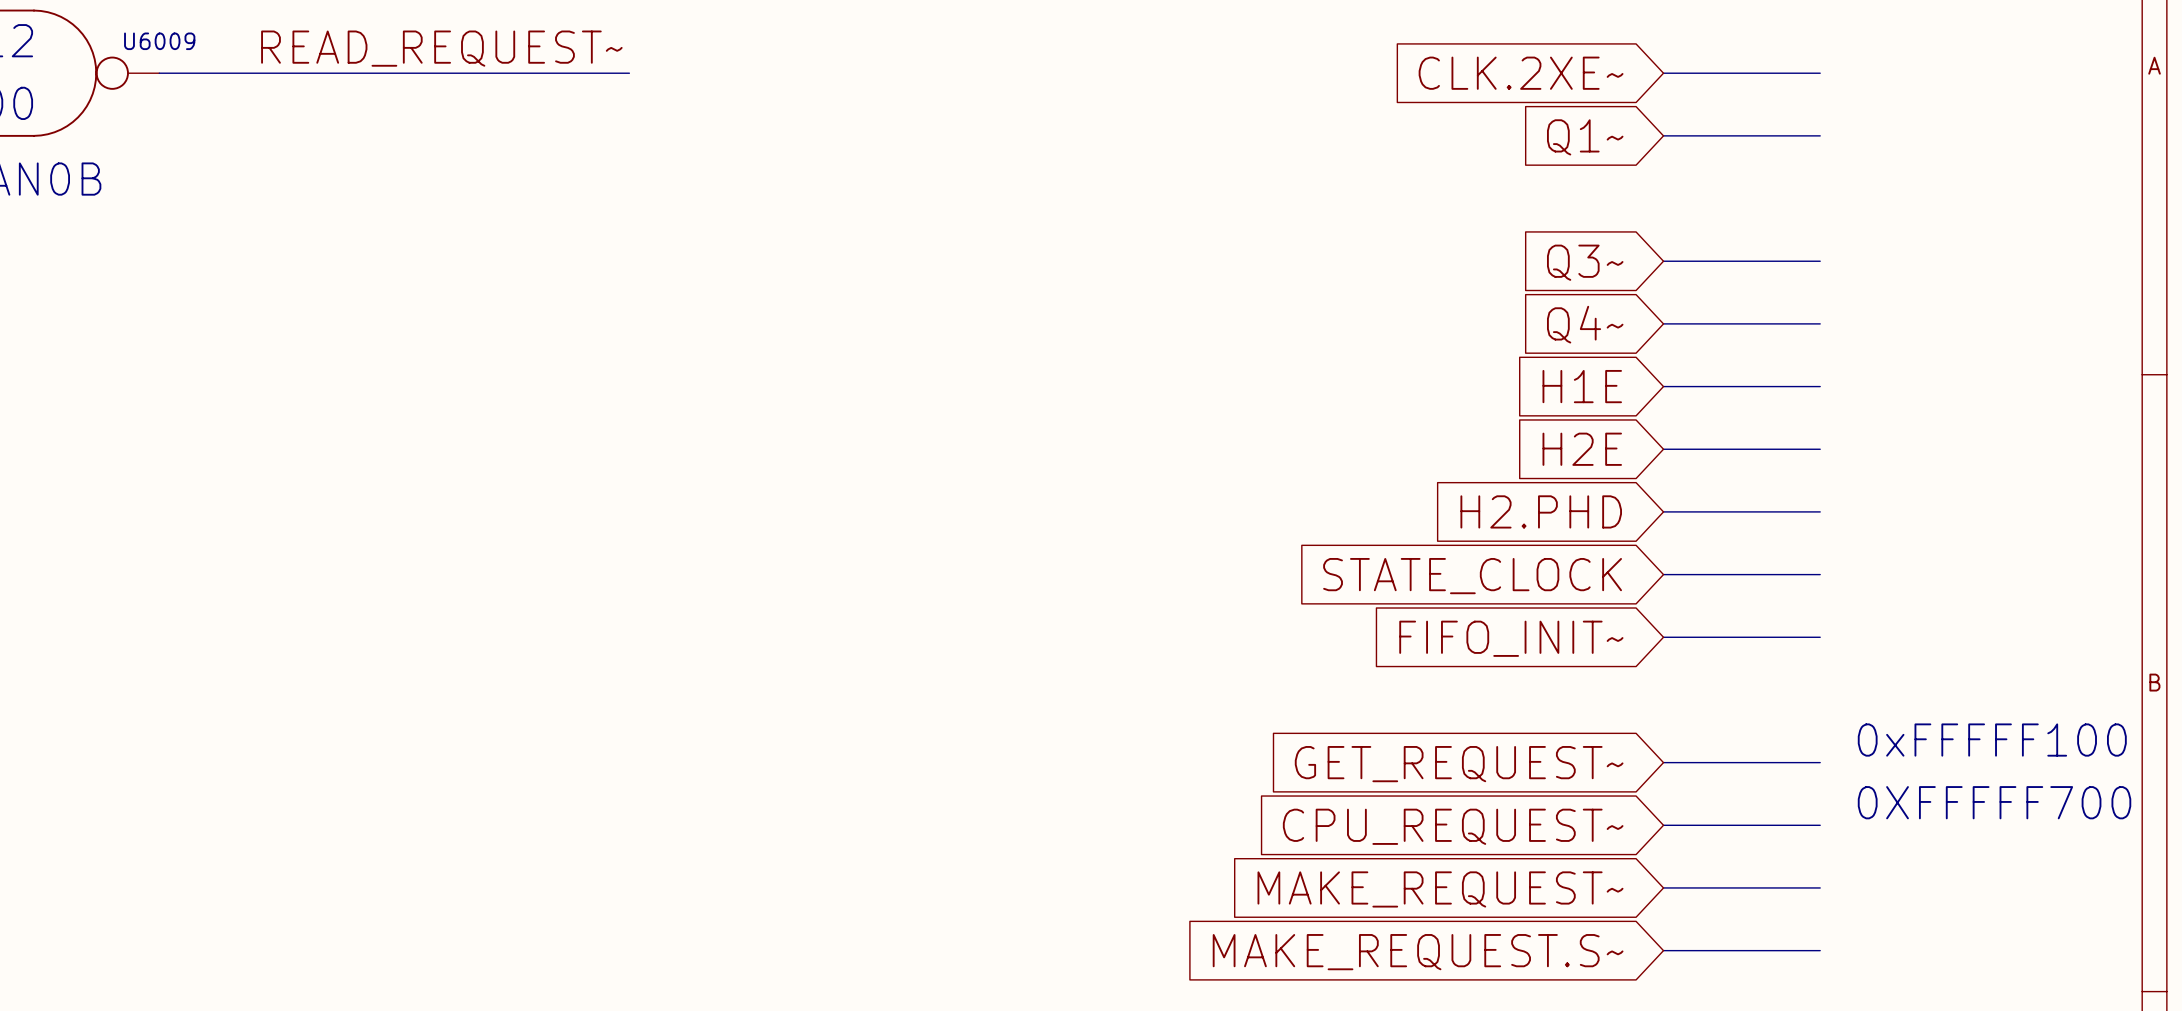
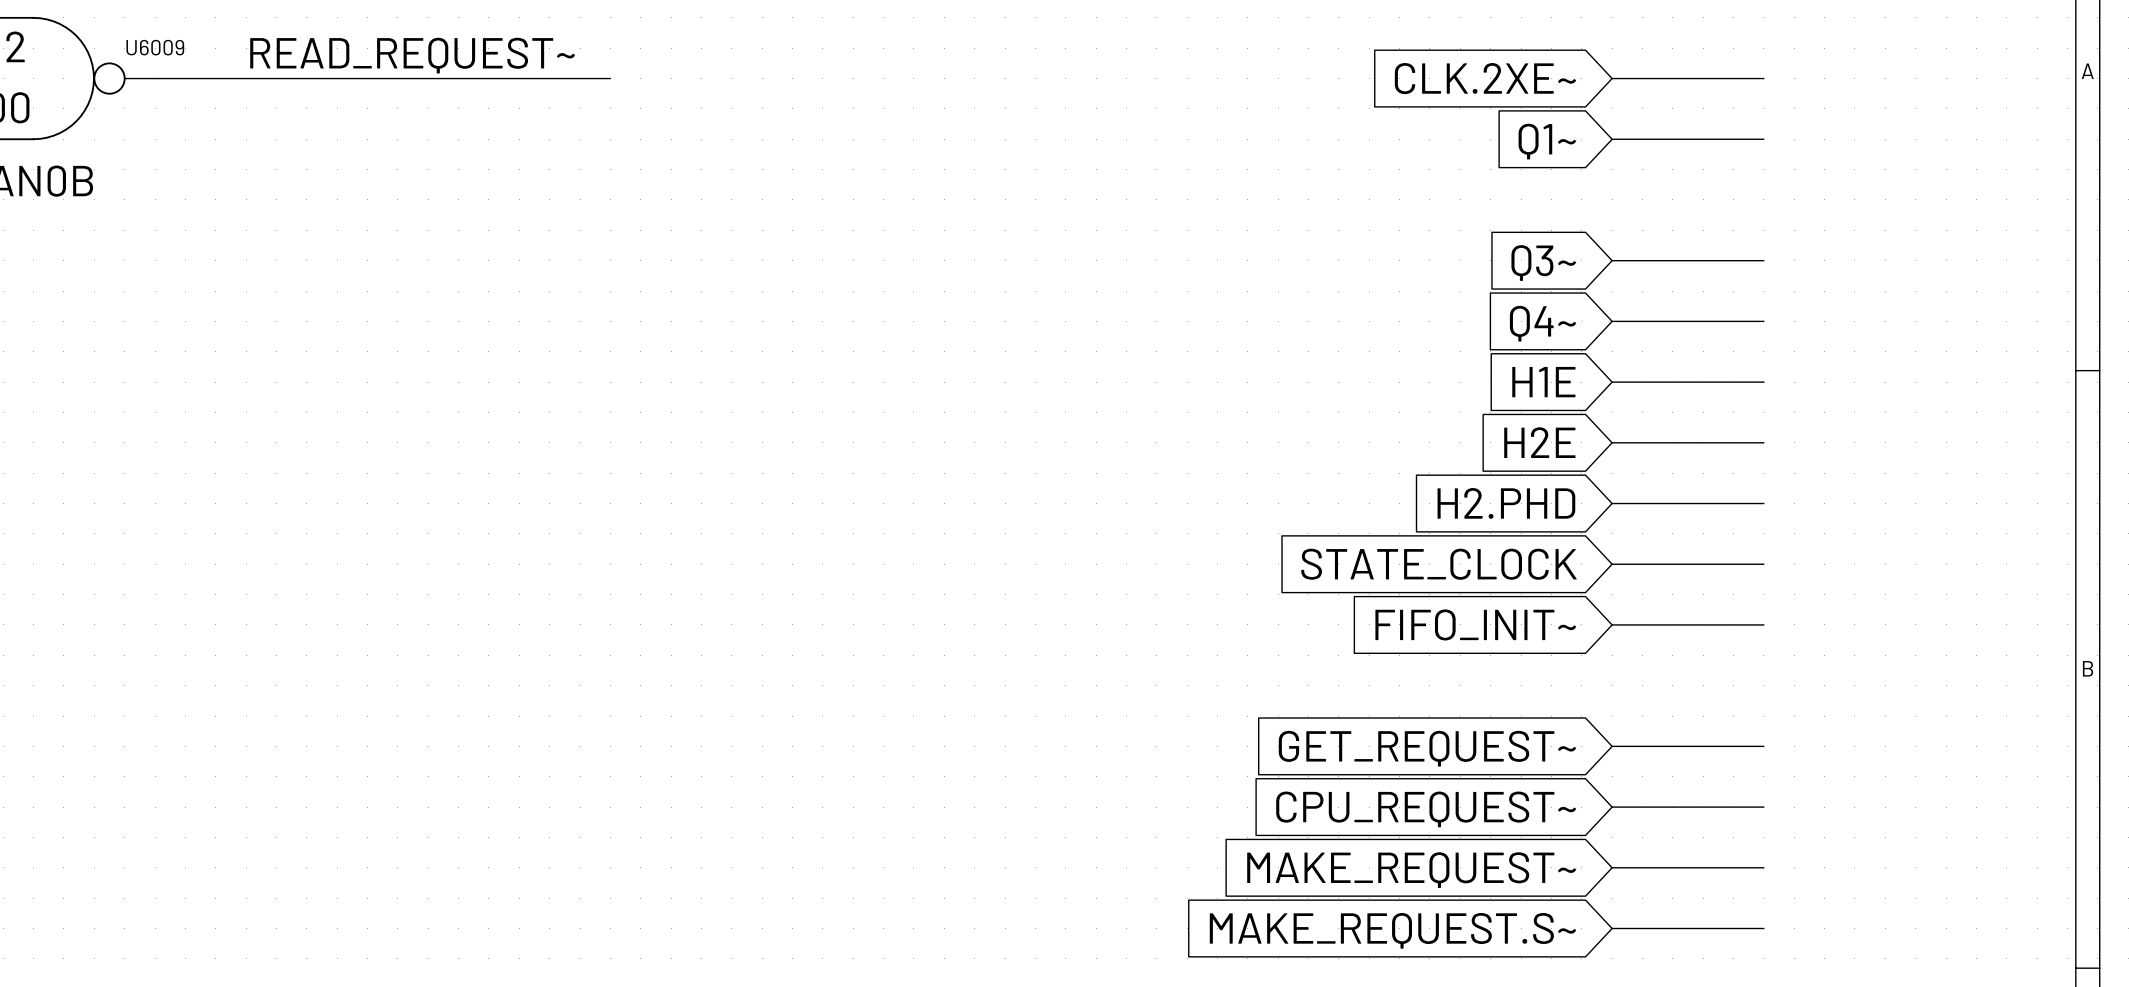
text: 0xFFFFF100 (1992, 740) -> none
text: 0XFFFFF700 (1994, 802) -> none

